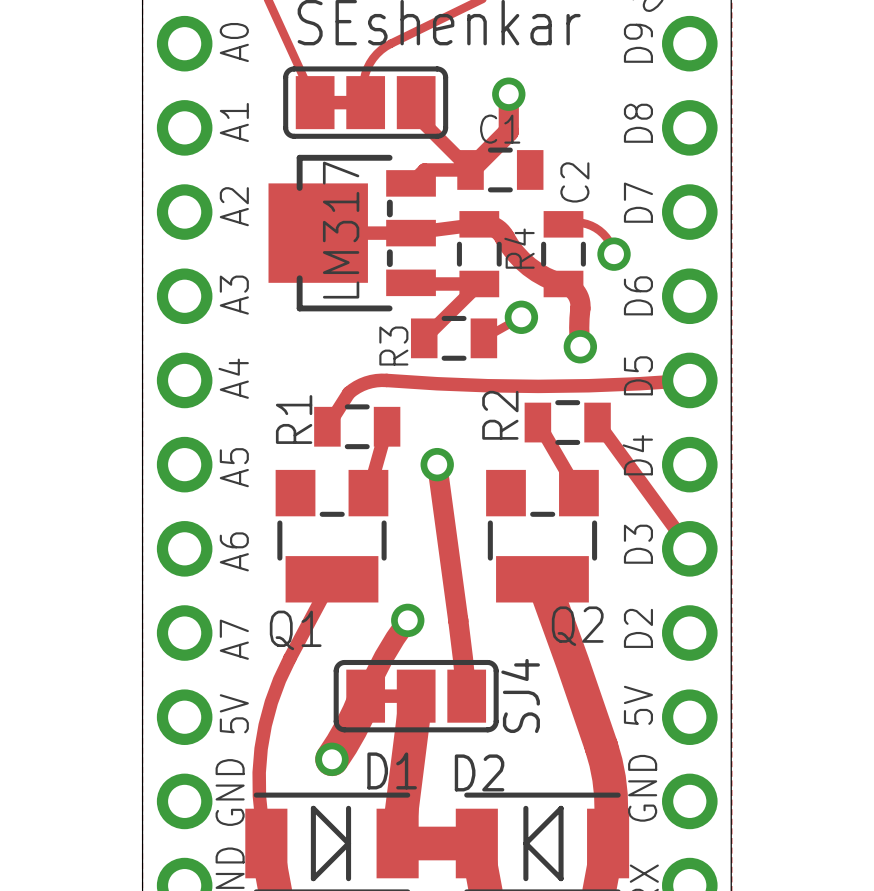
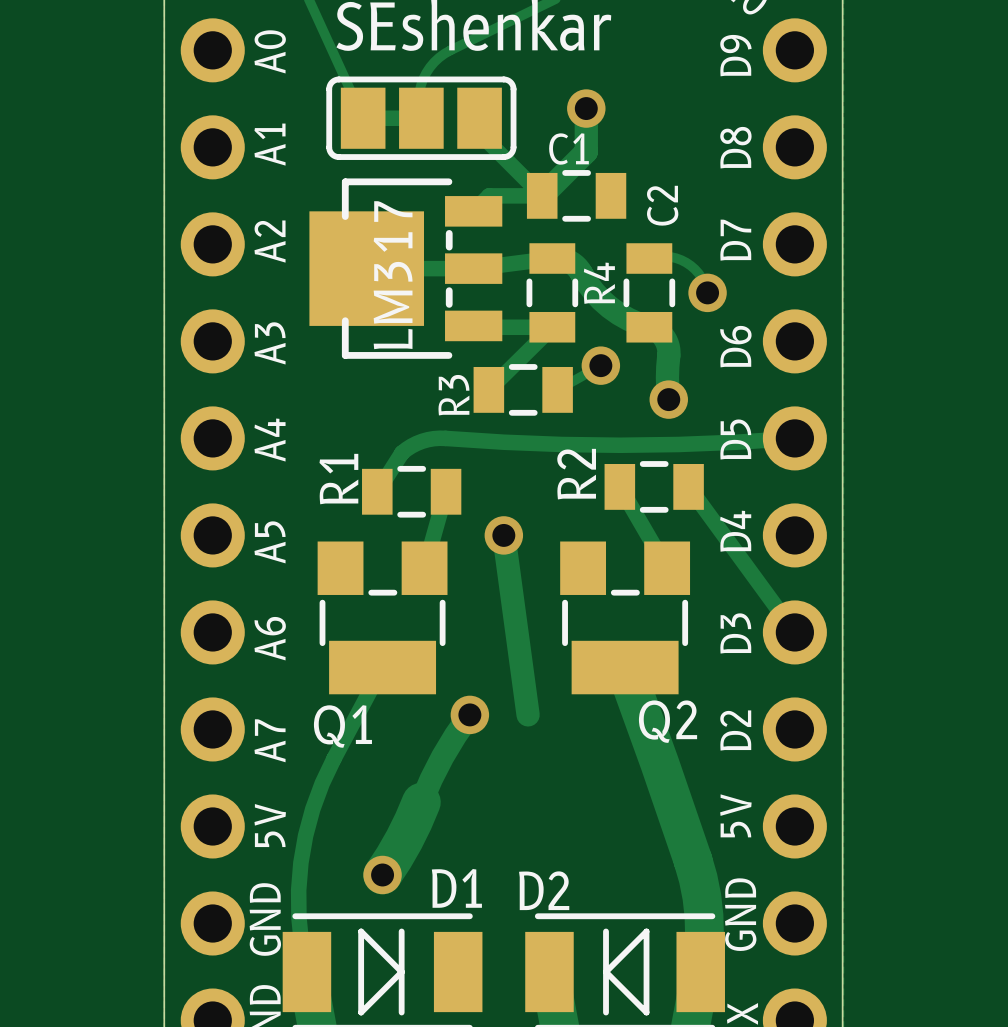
track: (458, 620) (466, 696) -> none
track: (416, 696) (397, 843) (476, 843) -> none
SJ4: (416, 696) -> none

